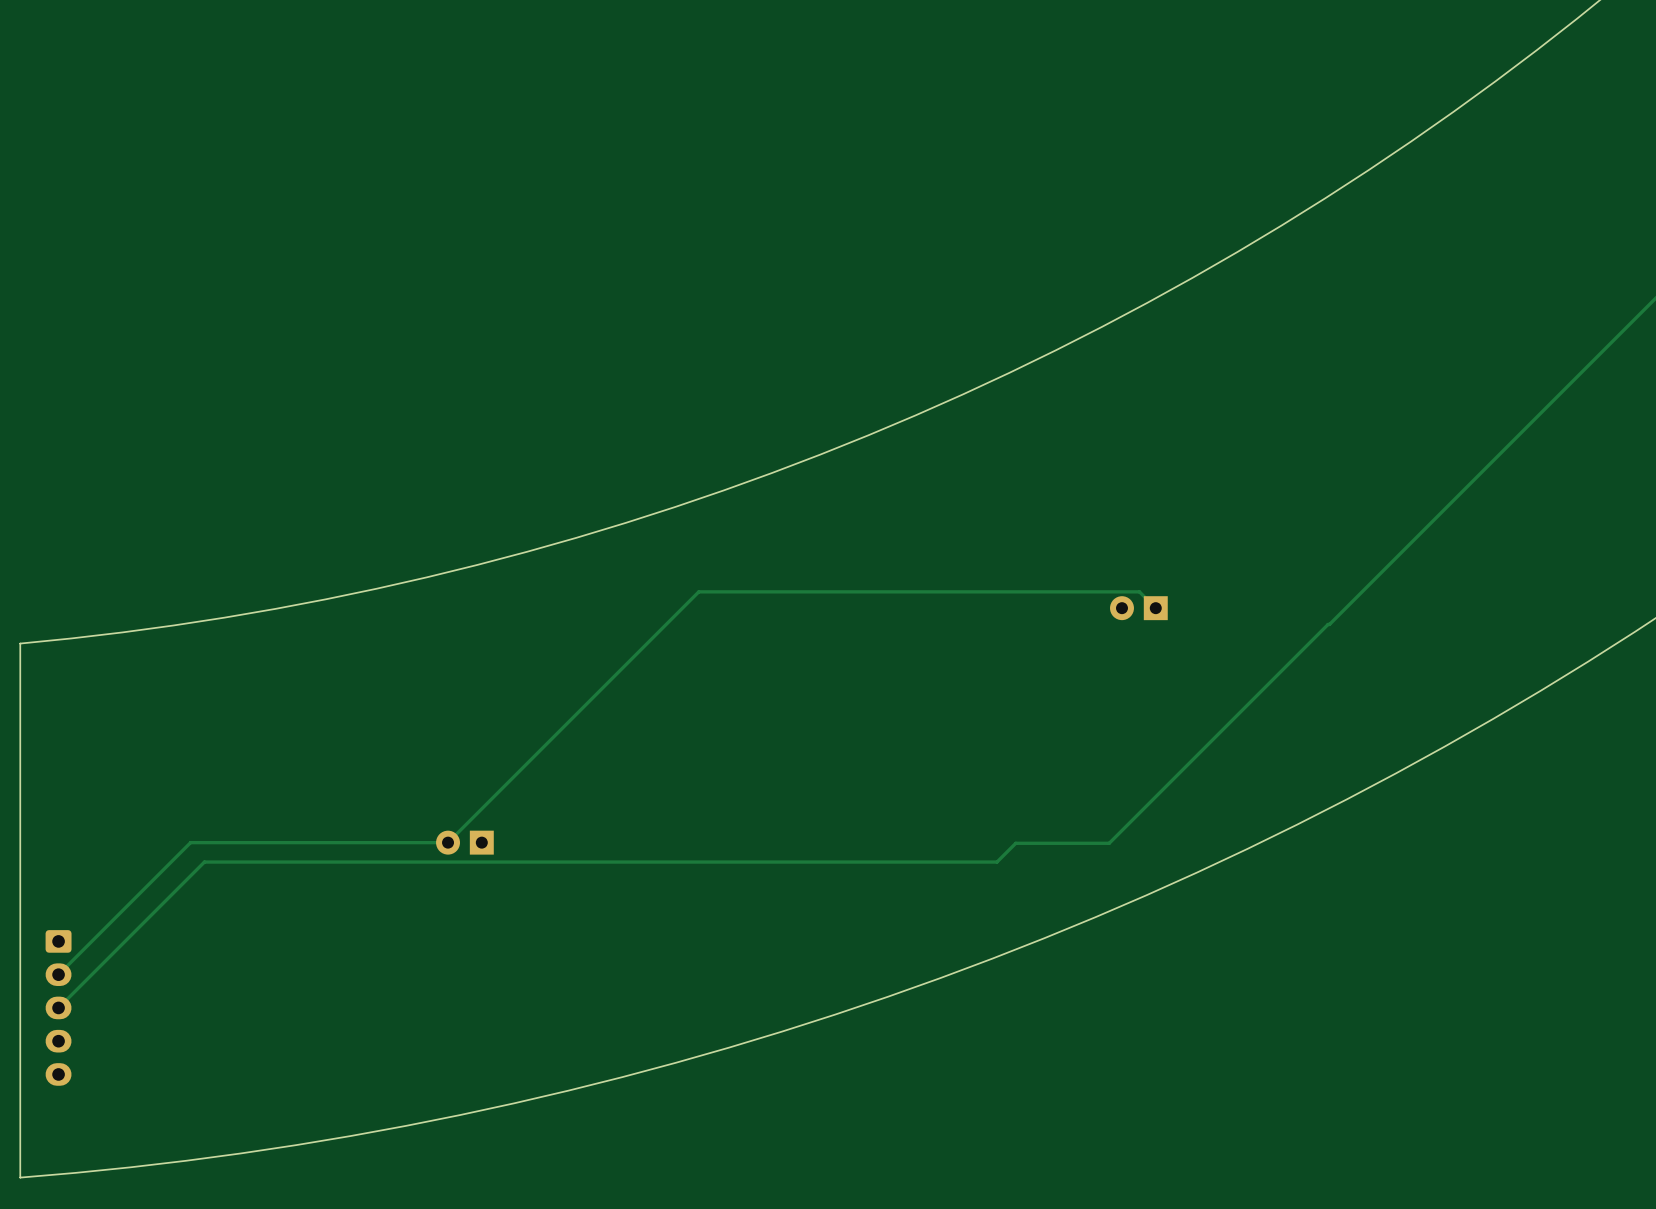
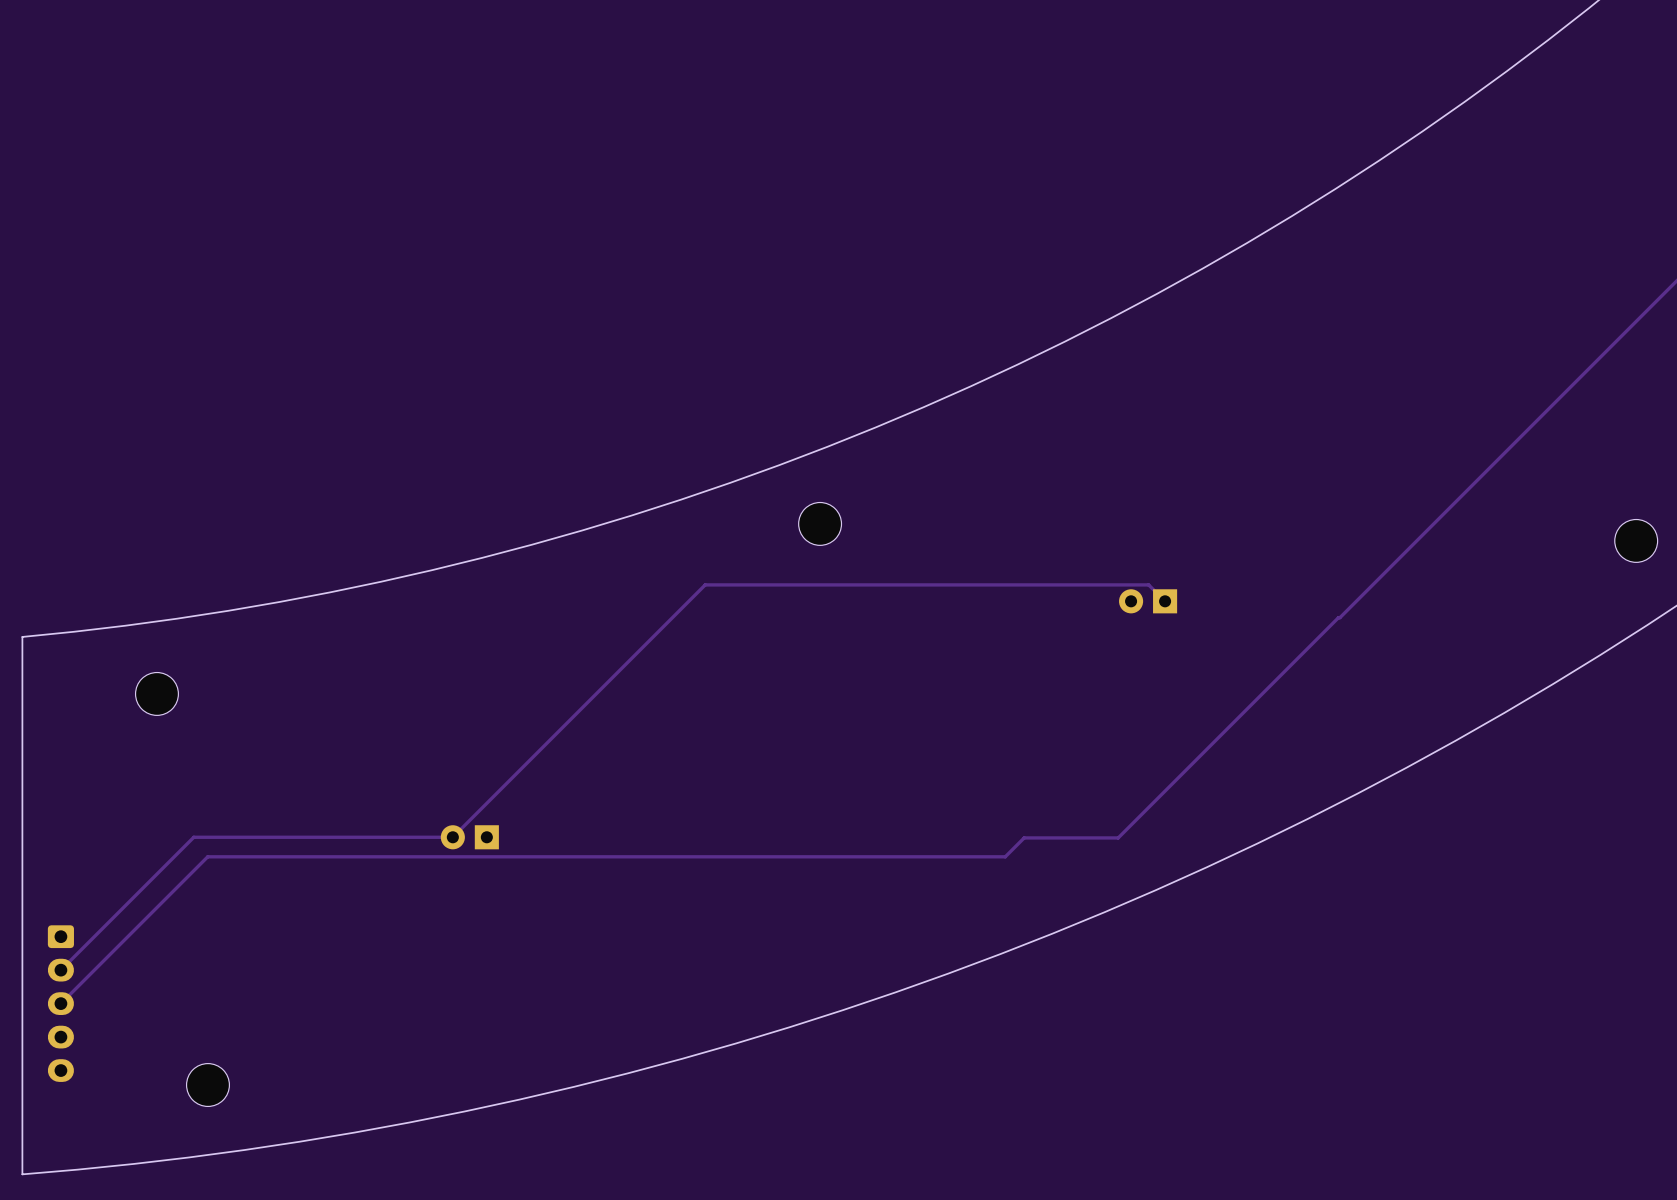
part: none -> (820, 523)
part: none -> (1636, 540)
part: none -> (156, 693)
part: none -> (207, 1085)

